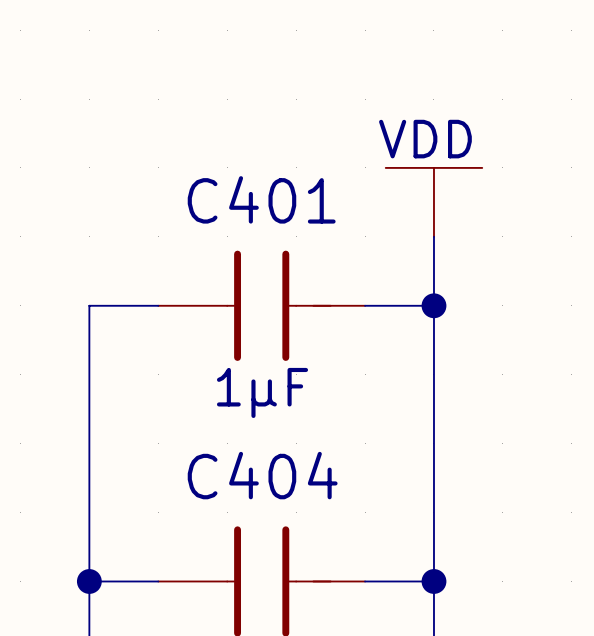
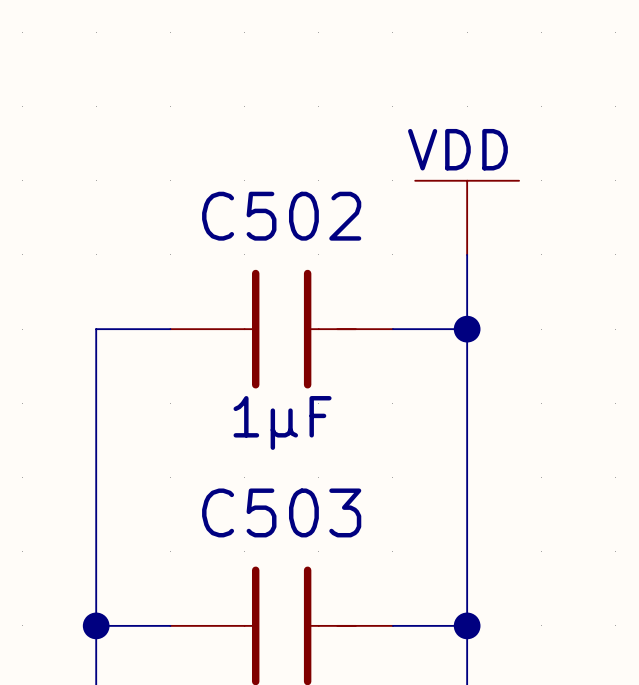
C401 name: C401 (261, 199) -> C502 (281, 216)
C404 name: C404 (262, 475) -> C503 (281, 512)

